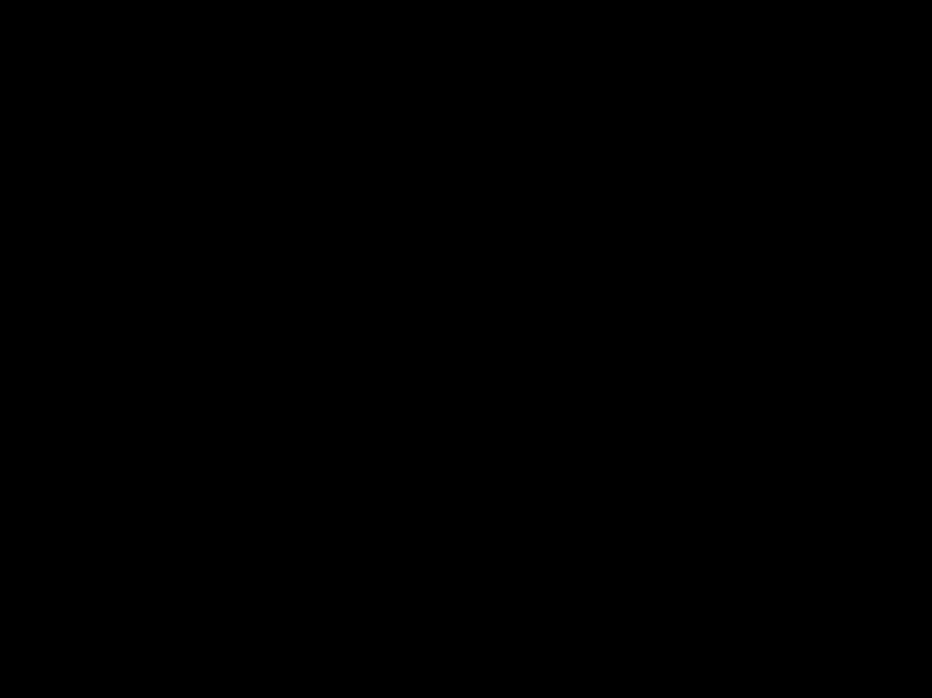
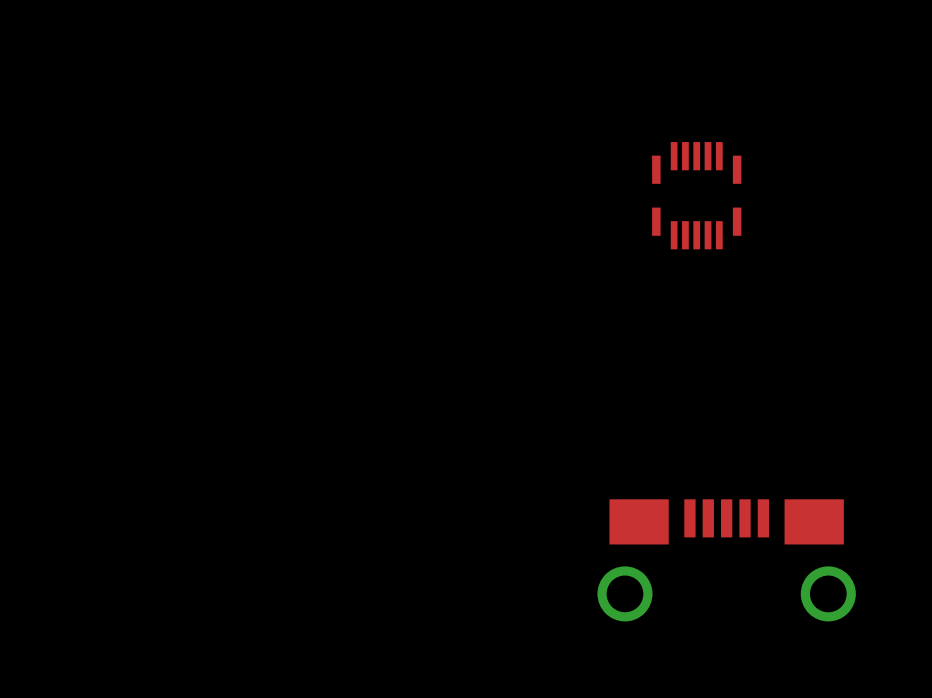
part: none -> (696, 195)
part: none -> (726, 560)

